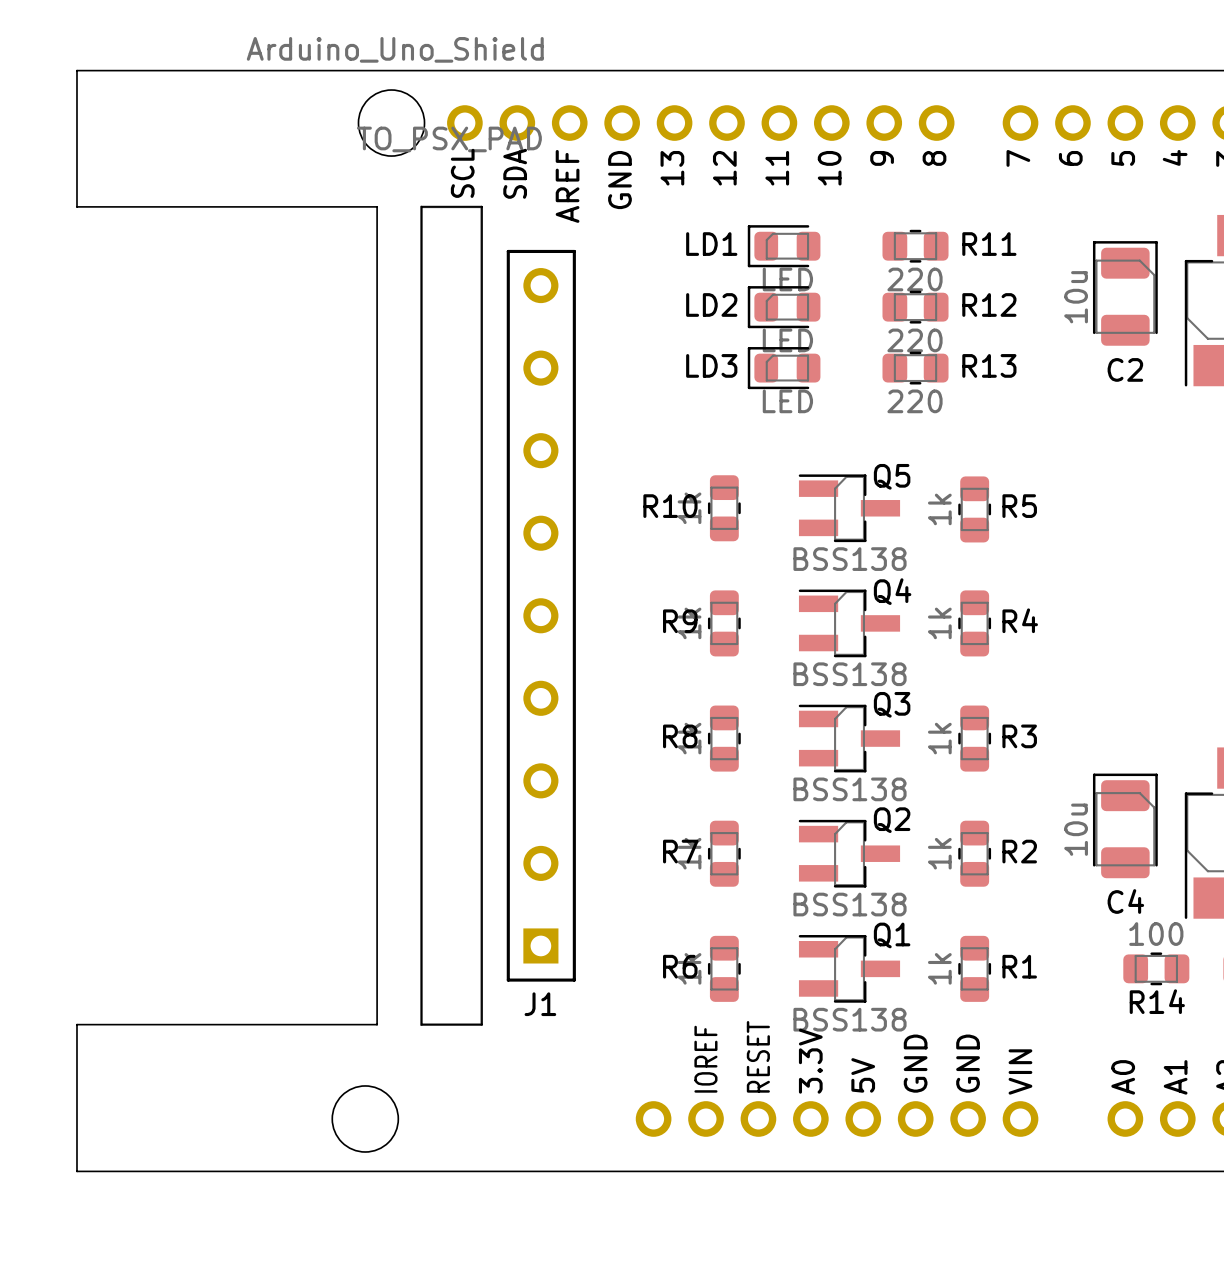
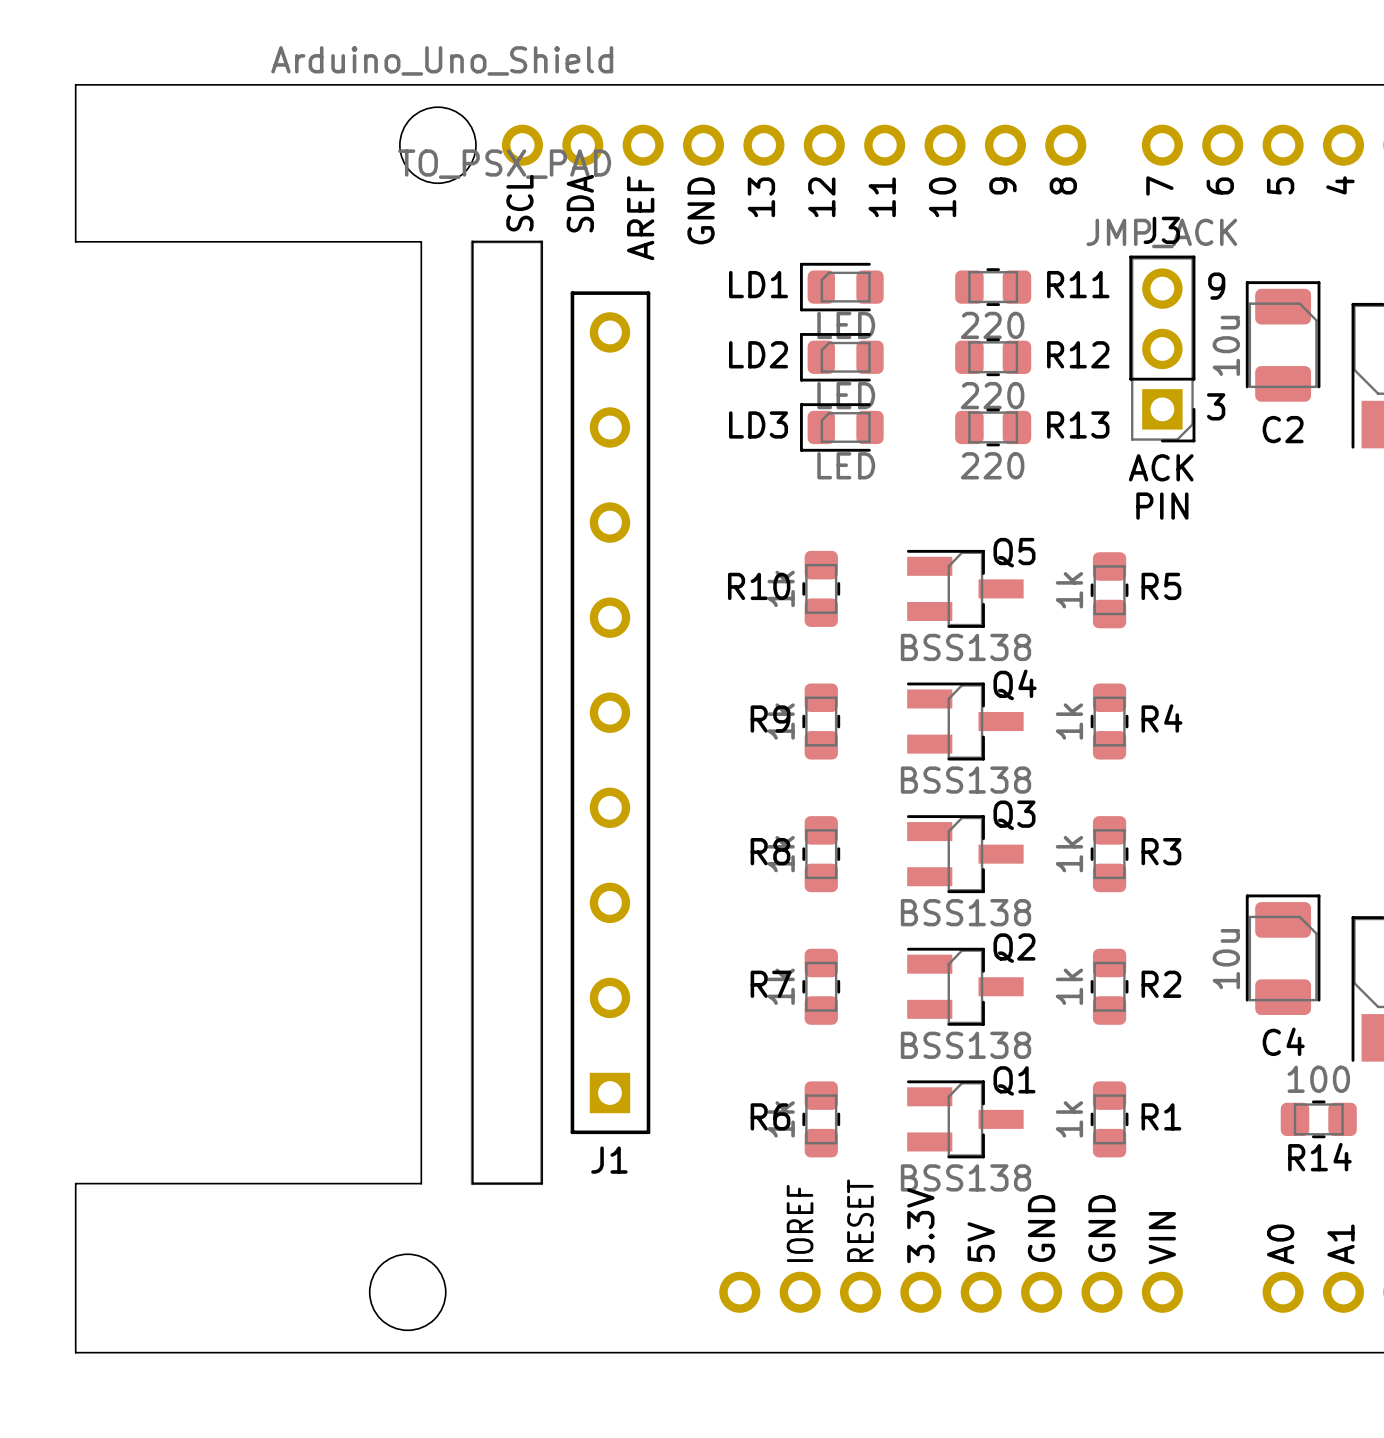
text: none -> 9 (1216, 286)
LD1 position: (784, 246) -> (841, 287)
R11 position: (915, 246) -> (993, 287)
J3: none -> JMP_ACK (1162, 348)
LD2 position: (784, 307) -> (841, 357)
R12 position: (915, 307) -> (993, 357)
text: none -> 3 (1216, 406)
LD3 position: (784, 368) -> (841, 427)
R13 position: (915, 368) -> (993, 427)
text: none -> ACK (1161, 467)
text: none -> PIN (1162, 506)

